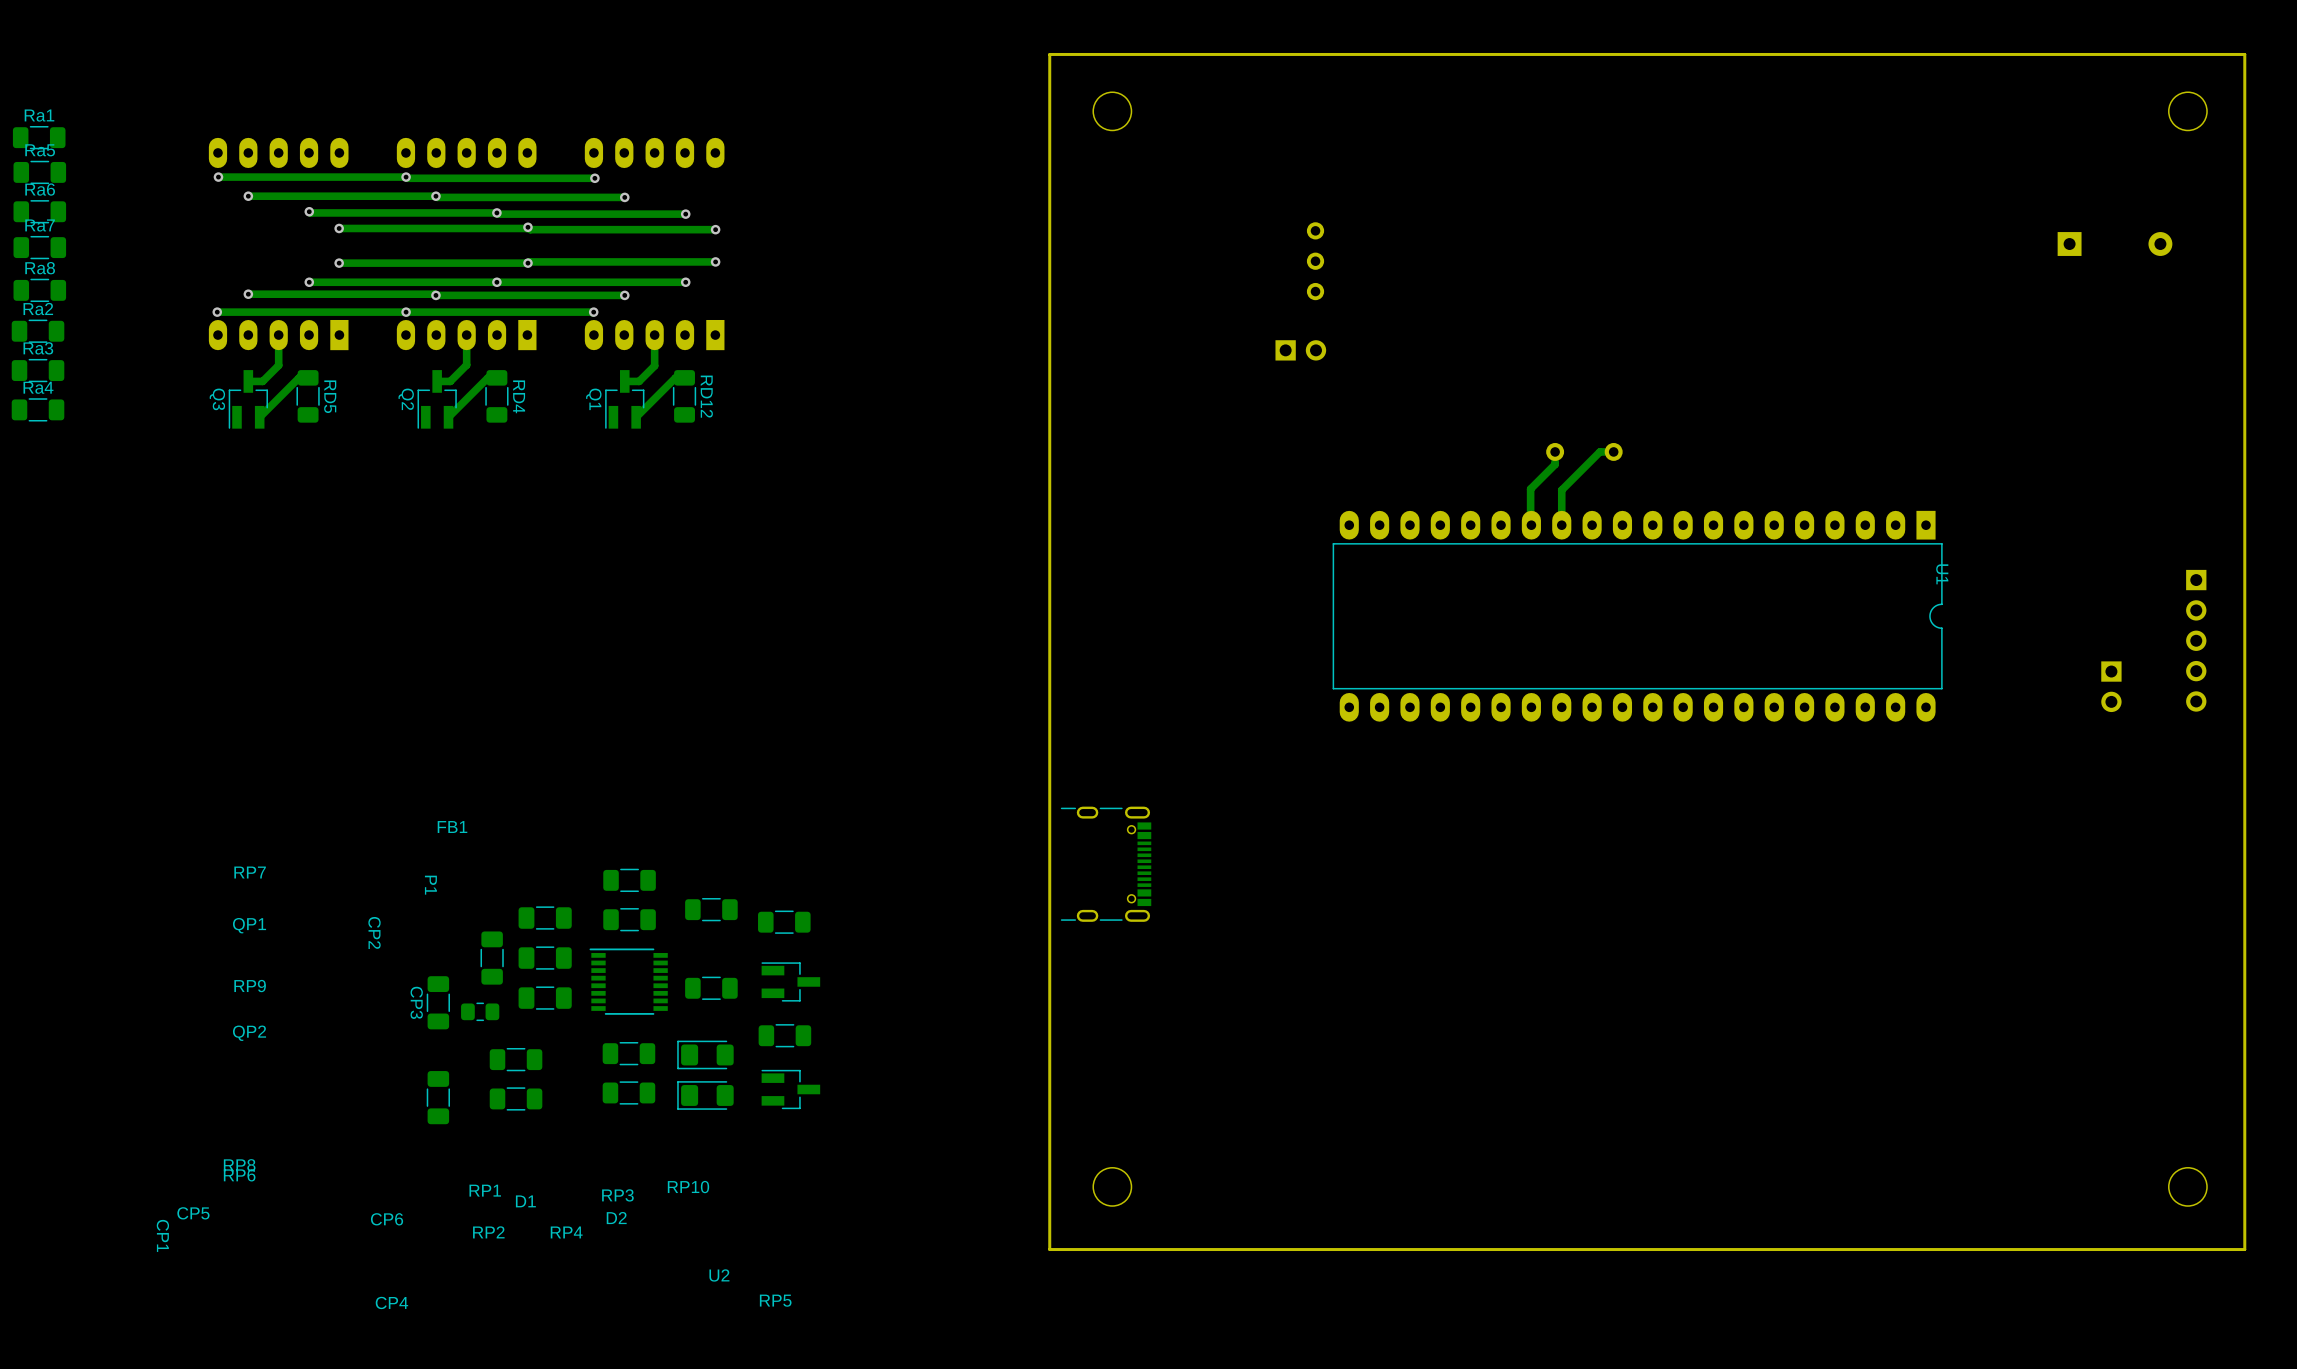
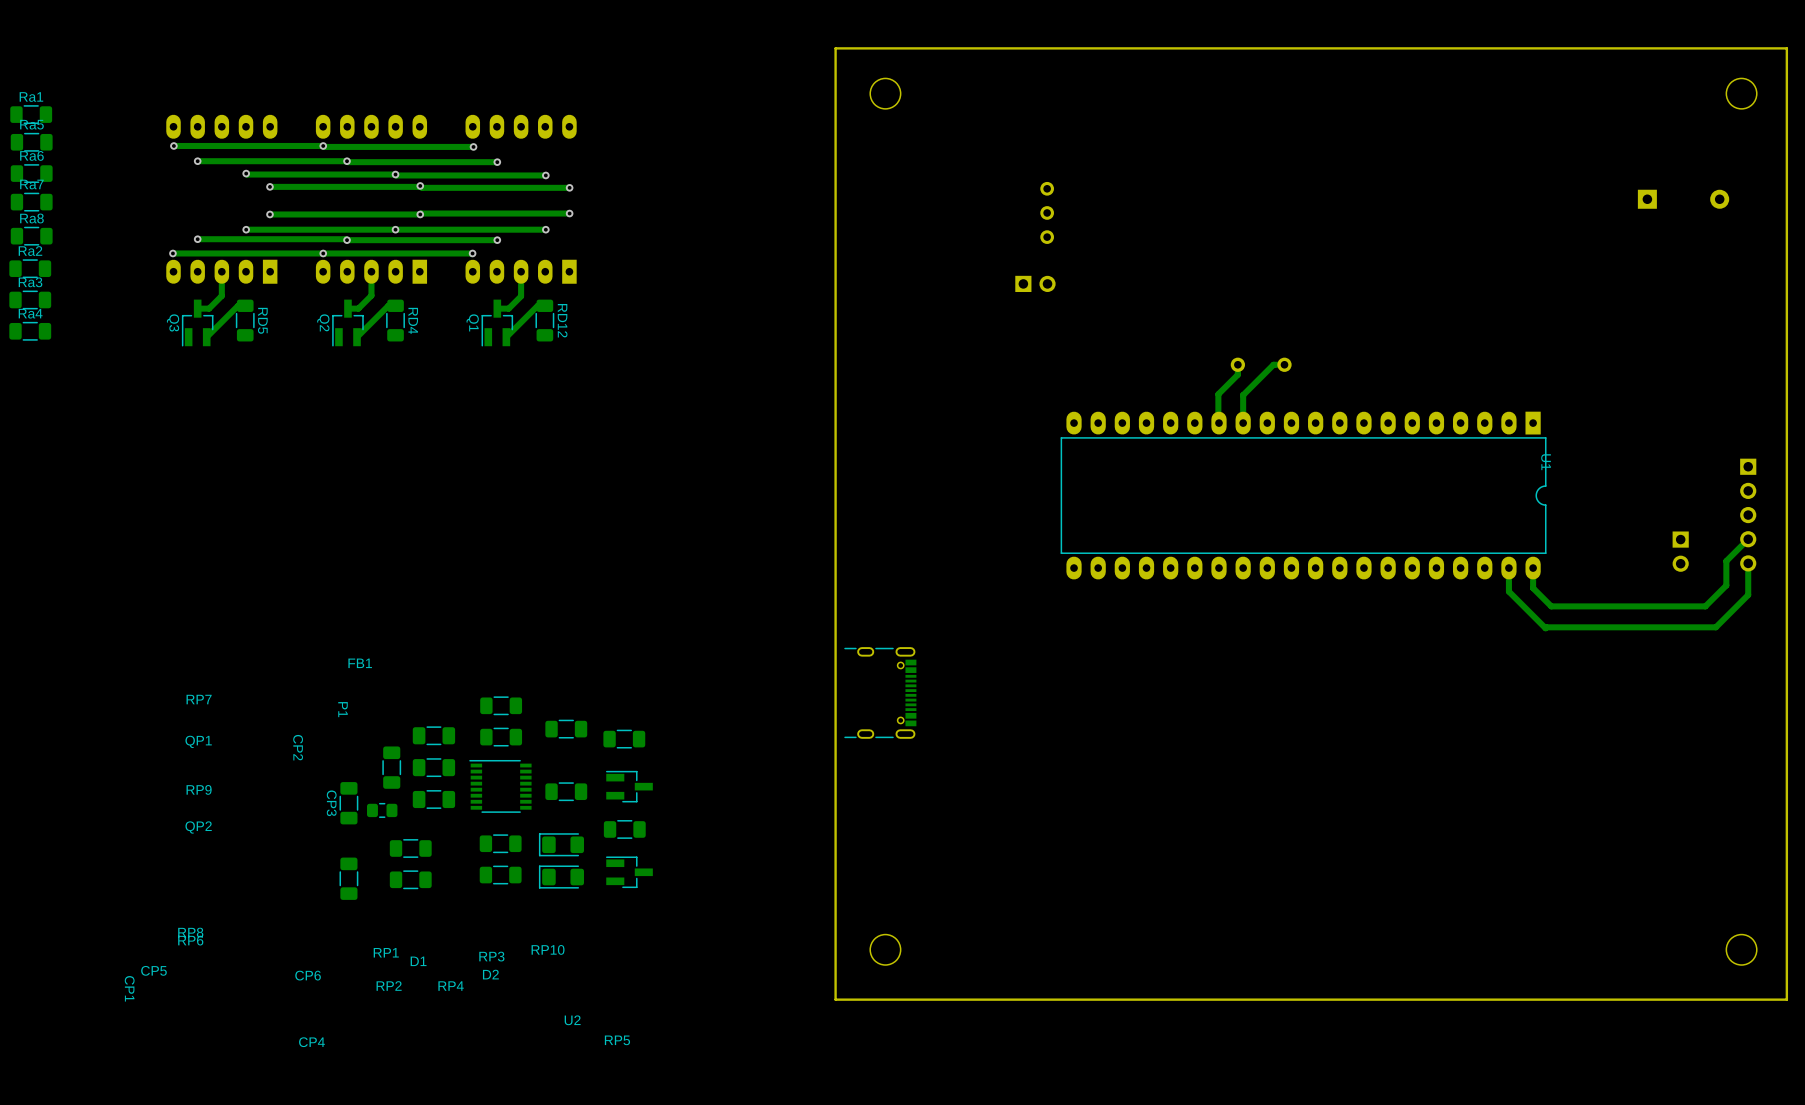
track: none -> (1748, 539) (1726, 561) (1726, 585) (1705, 606) (1551, 606) (1533, 588) (1533, 568)
track: none -> (1748, 563) (1748, 594) (1715, 627) (1545, 628) (1508, 591) (1508, 568)

